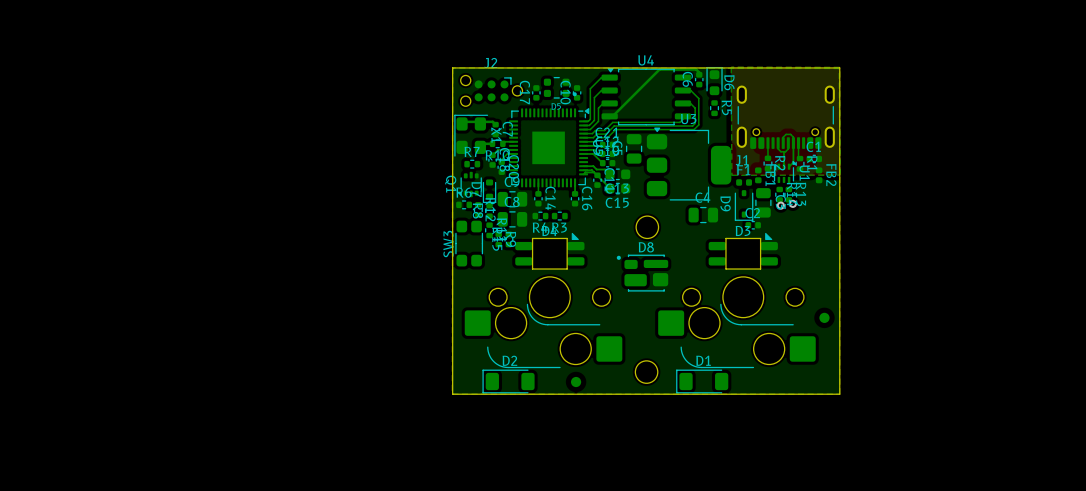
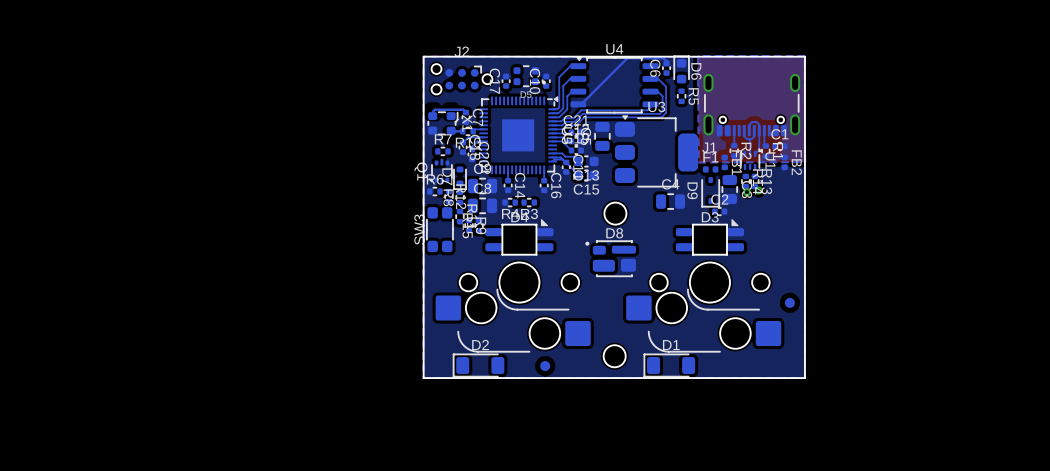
X1 footprint: [454, 114, 489, 157] -> [427, 111, 459, 136]

